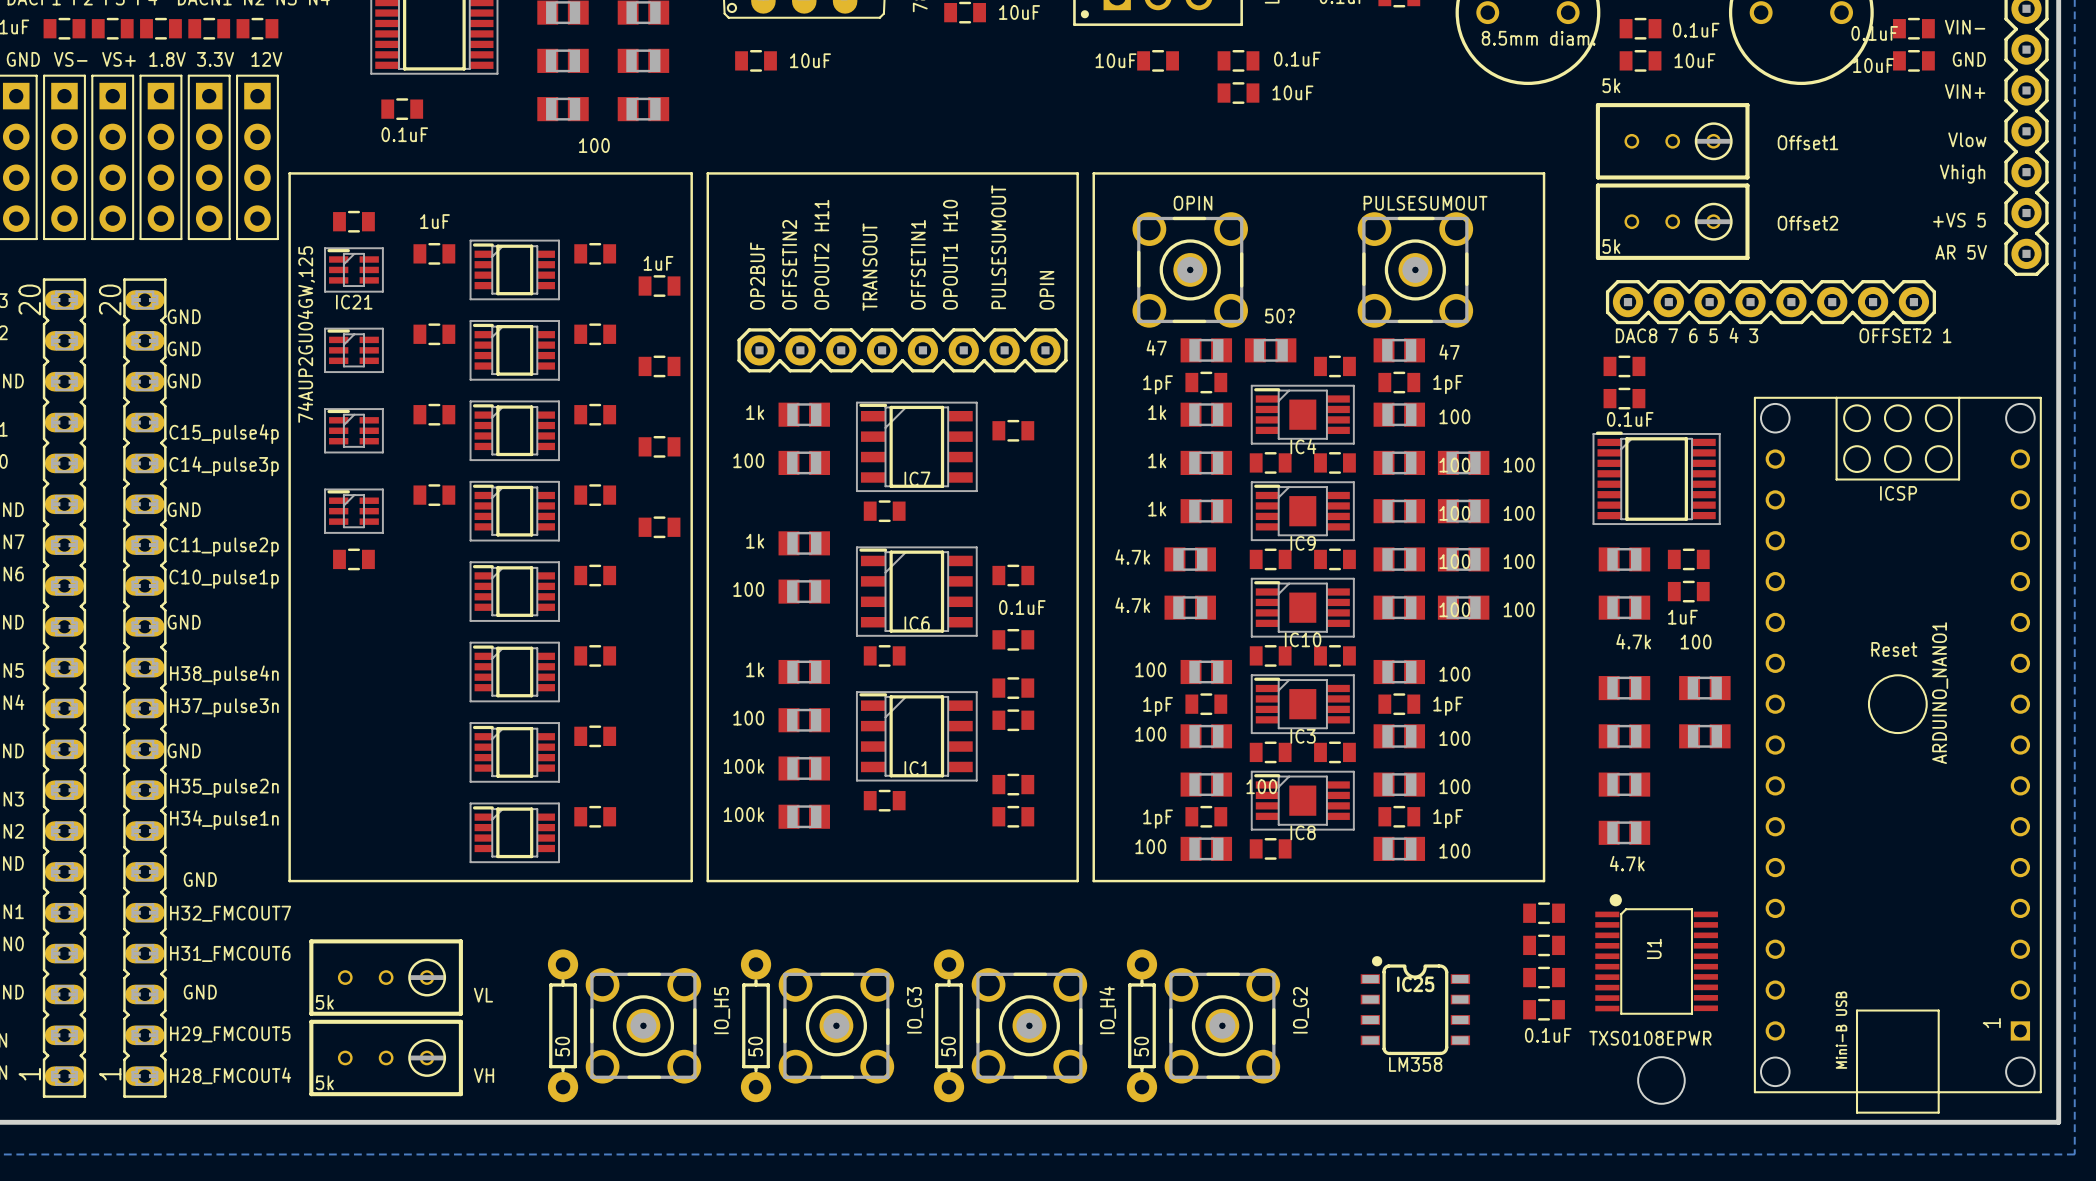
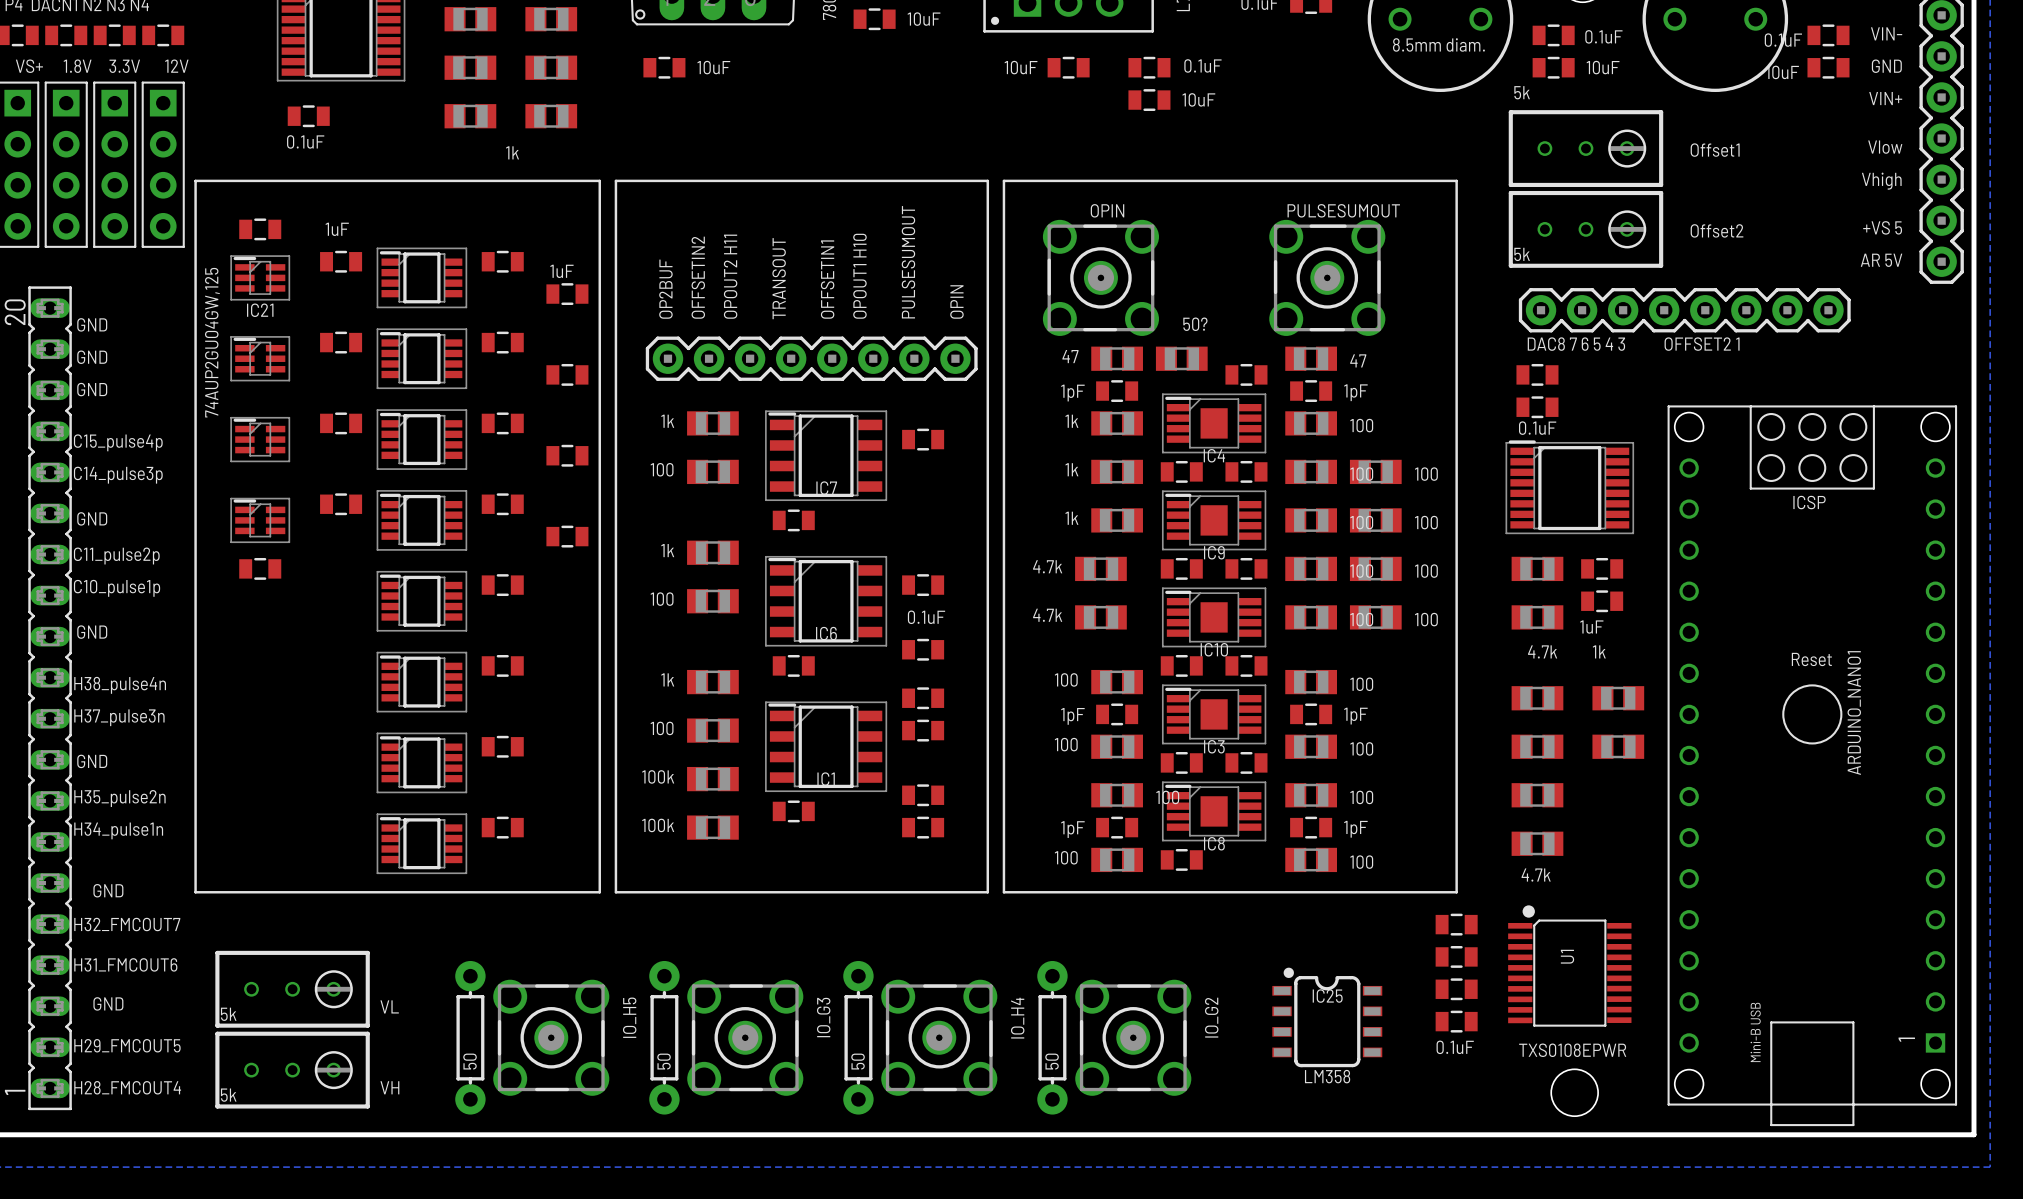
part value: 100 (594, 145) -> 1k (512, 152)
part value: 100 (1696, 641) -> 1k (1599, 651)

